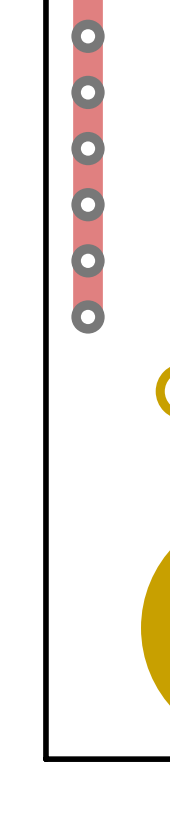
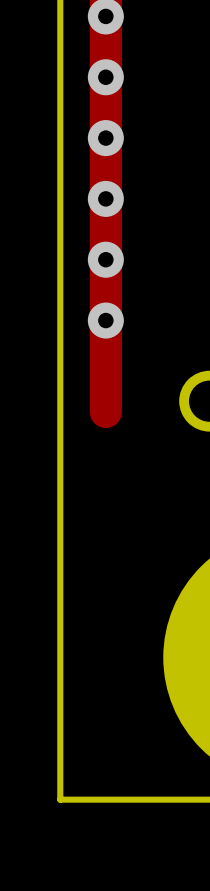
track: none -> (105, 320) (105, 411)

